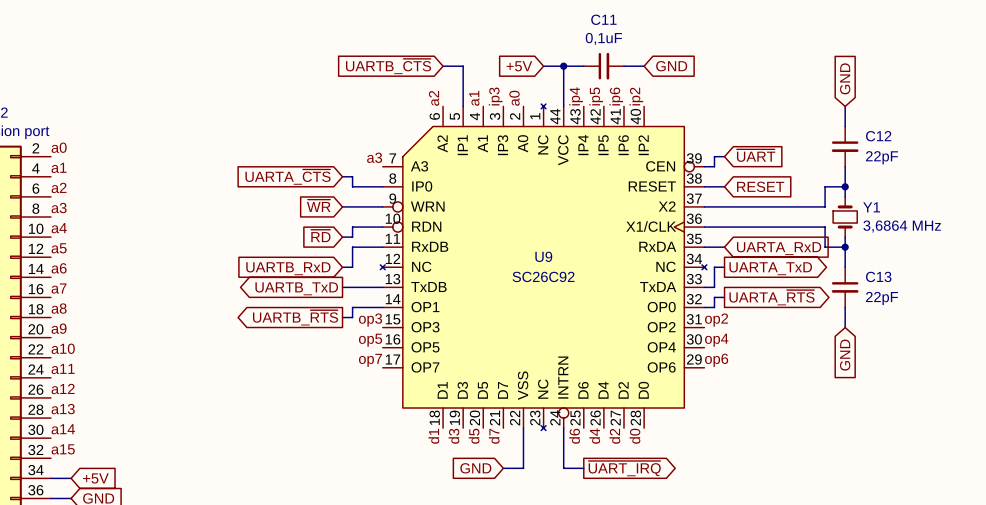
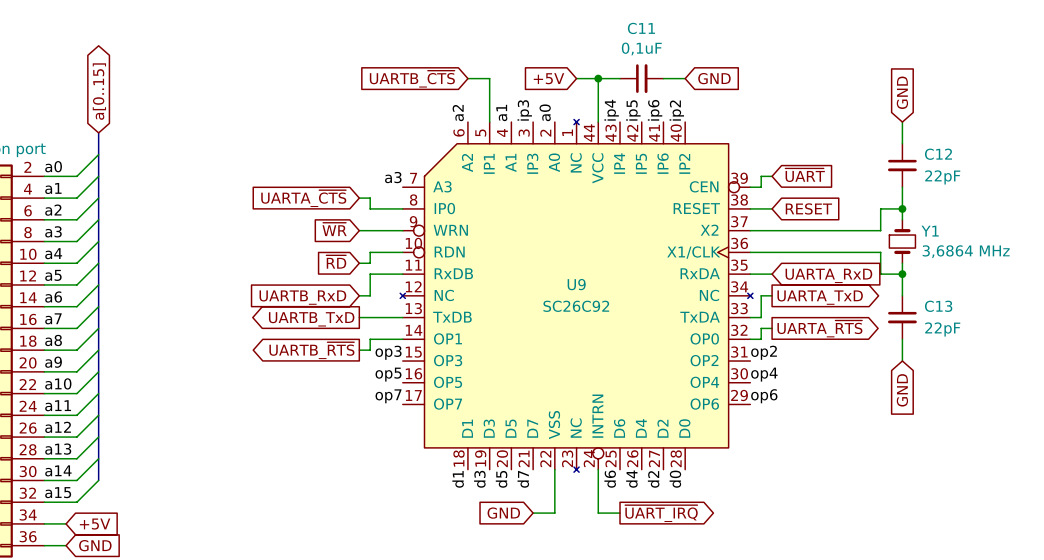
global label: none -> a[0..15] (99, 91)
bus: none -> (98, 132) (98, 480)
wire: none -> (98, 154) (76, 176) (44, 176)
wire: none -> (98, 176) (76, 198) (44, 198)
wire: none -> (98, 198) (76, 219) (44, 219)
wire: none -> (98, 219) (76, 241) (44, 241)
wire: none -> (98, 241) (76, 263) (44, 263)
wire: none -> (98, 263) (76, 284) (44, 284)
wire: none -> (98, 284) (76, 306) (44, 306)
wire: none -> (98, 306) (76, 328) (44, 328)
wire: none -> (98, 328) (76, 350) (44, 350)
wire: none -> (98, 350) (76, 371) (44, 371)
wire: none -> (98, 371) (76, 393) (44, 393)
wire: none -> (98, 393) (76, 415) (44, 415)
wire: none -> (98, 415) (76, 437) (44, 437)
wire: none -> (98, 437) (76, 458) (44, 458)
wire: none -> (98, 458) (76, 480) (44, 480)
wire: none -> (98, 480) (76, 502) (44, 502)

